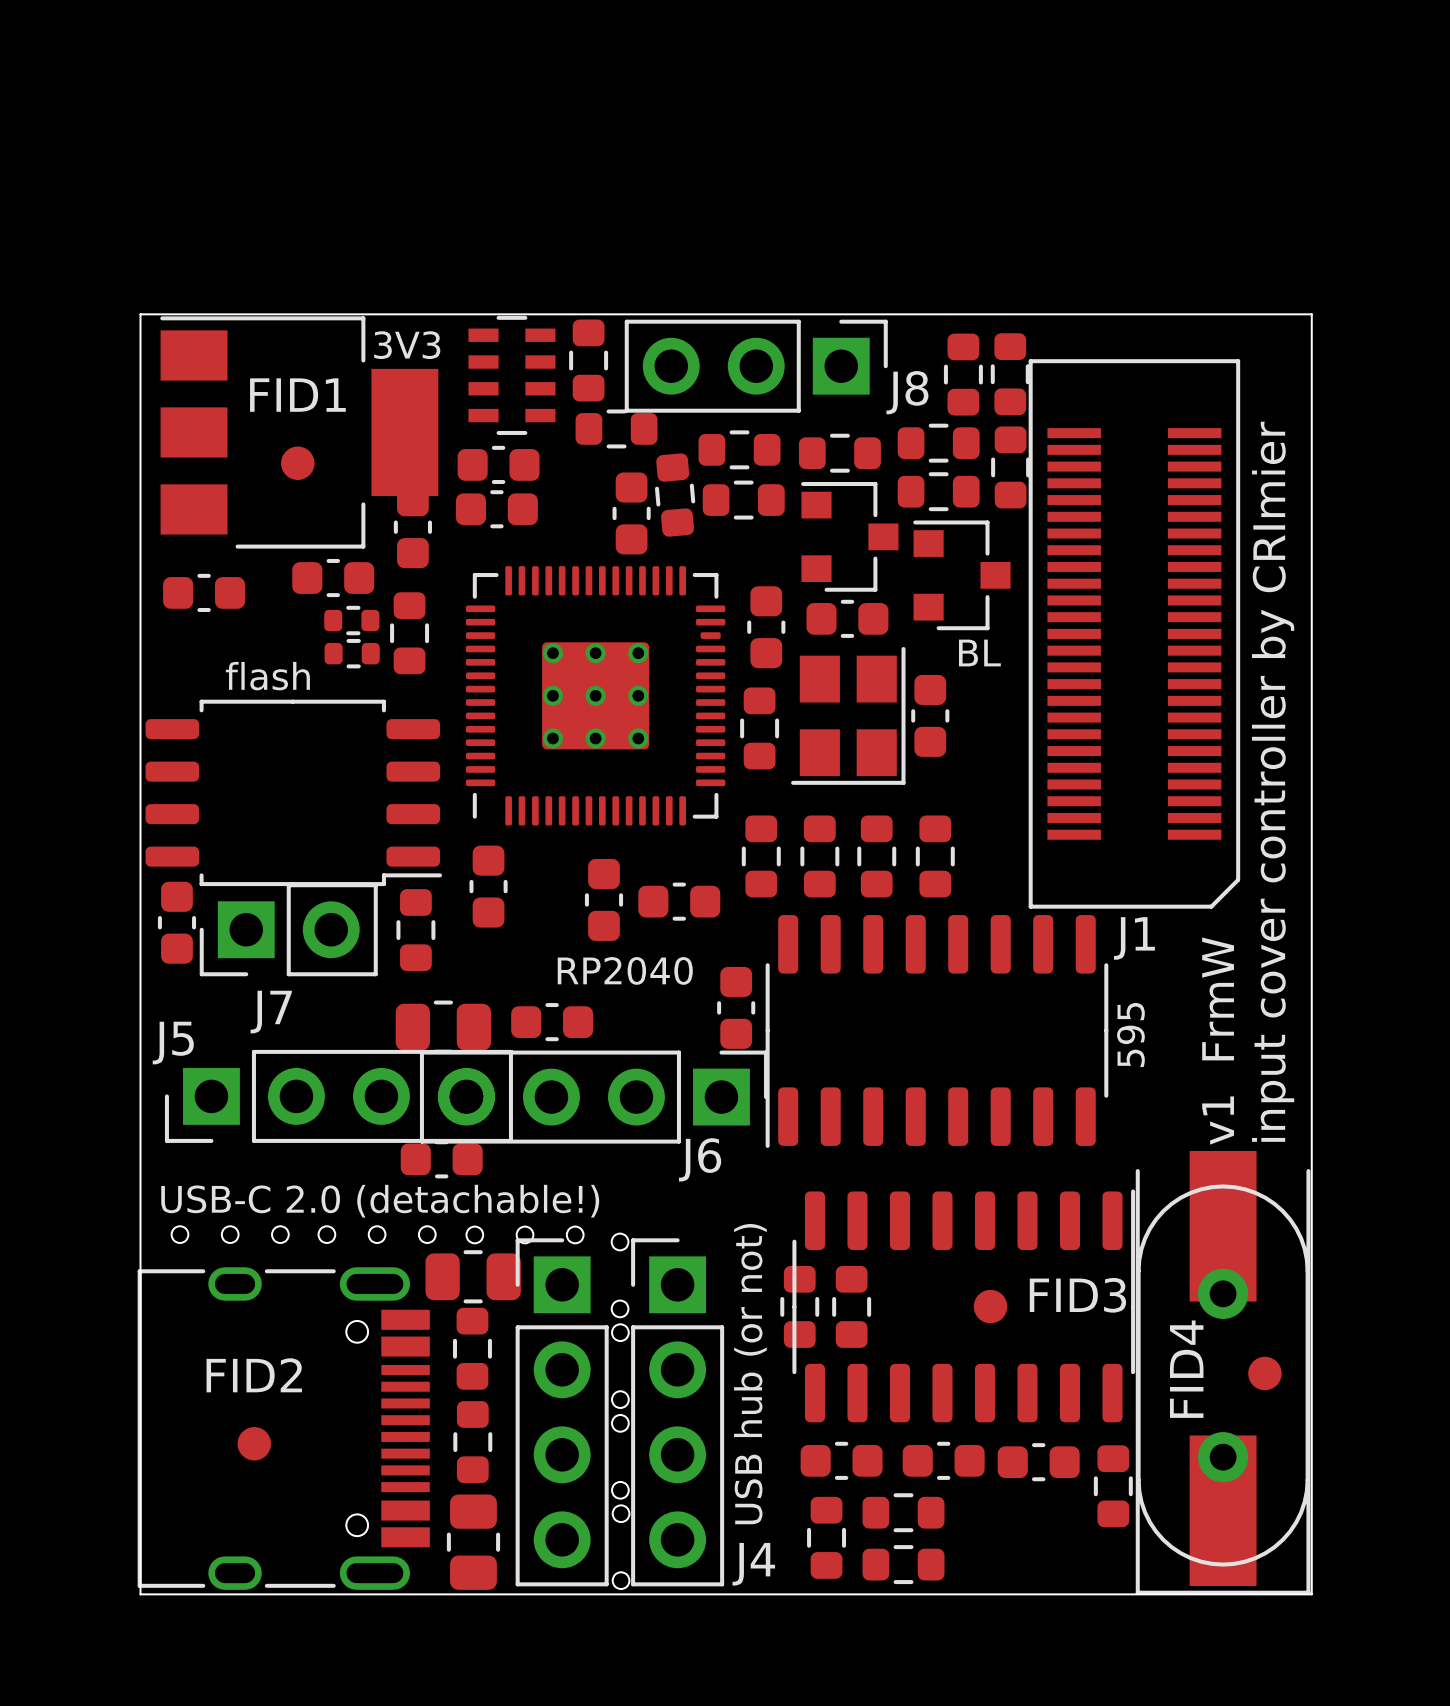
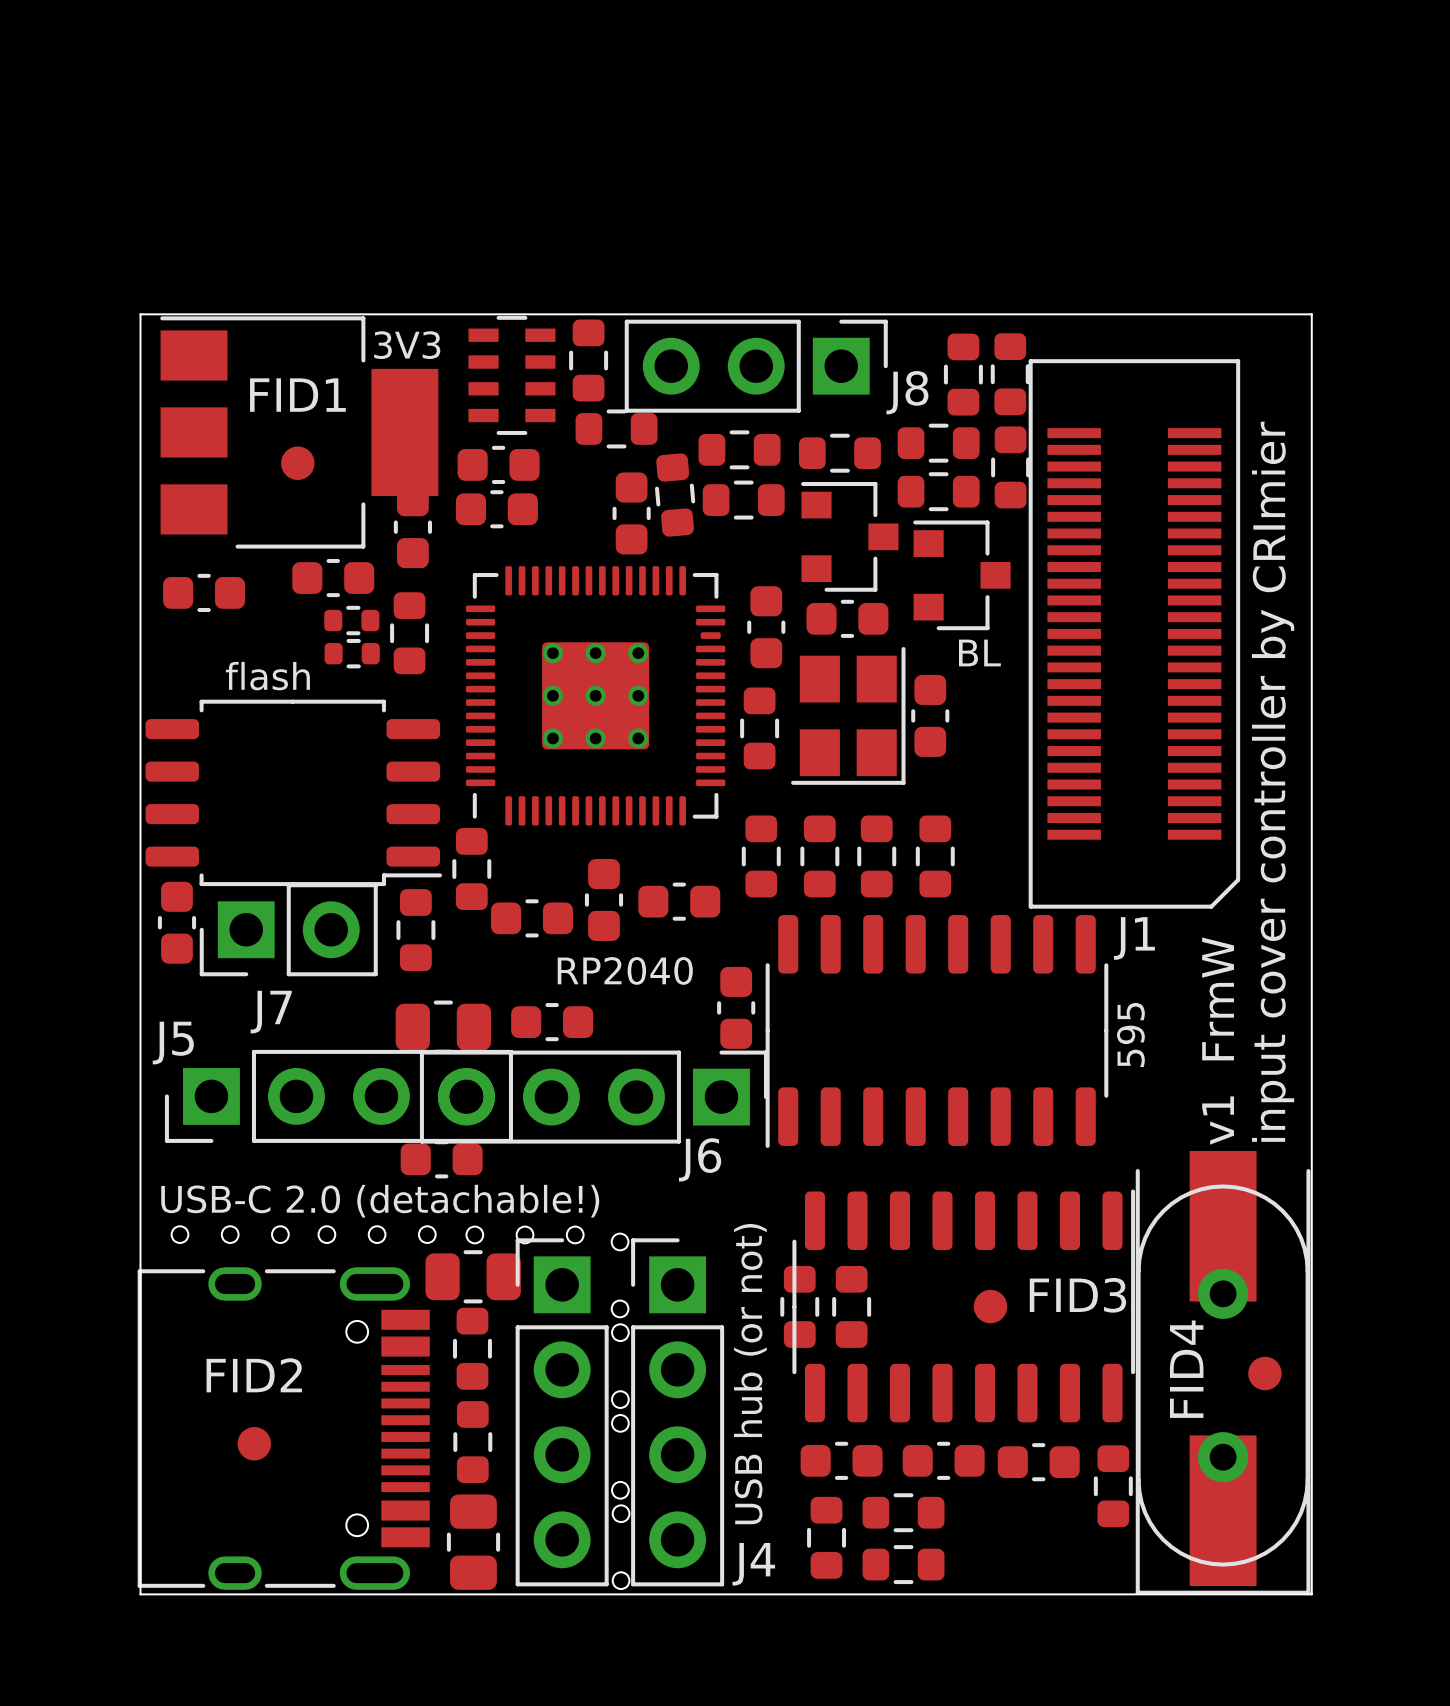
part footprint: [469, 845, 508, 928] -> [452, 828, 492, 911]
part: none -> (532, 918)

